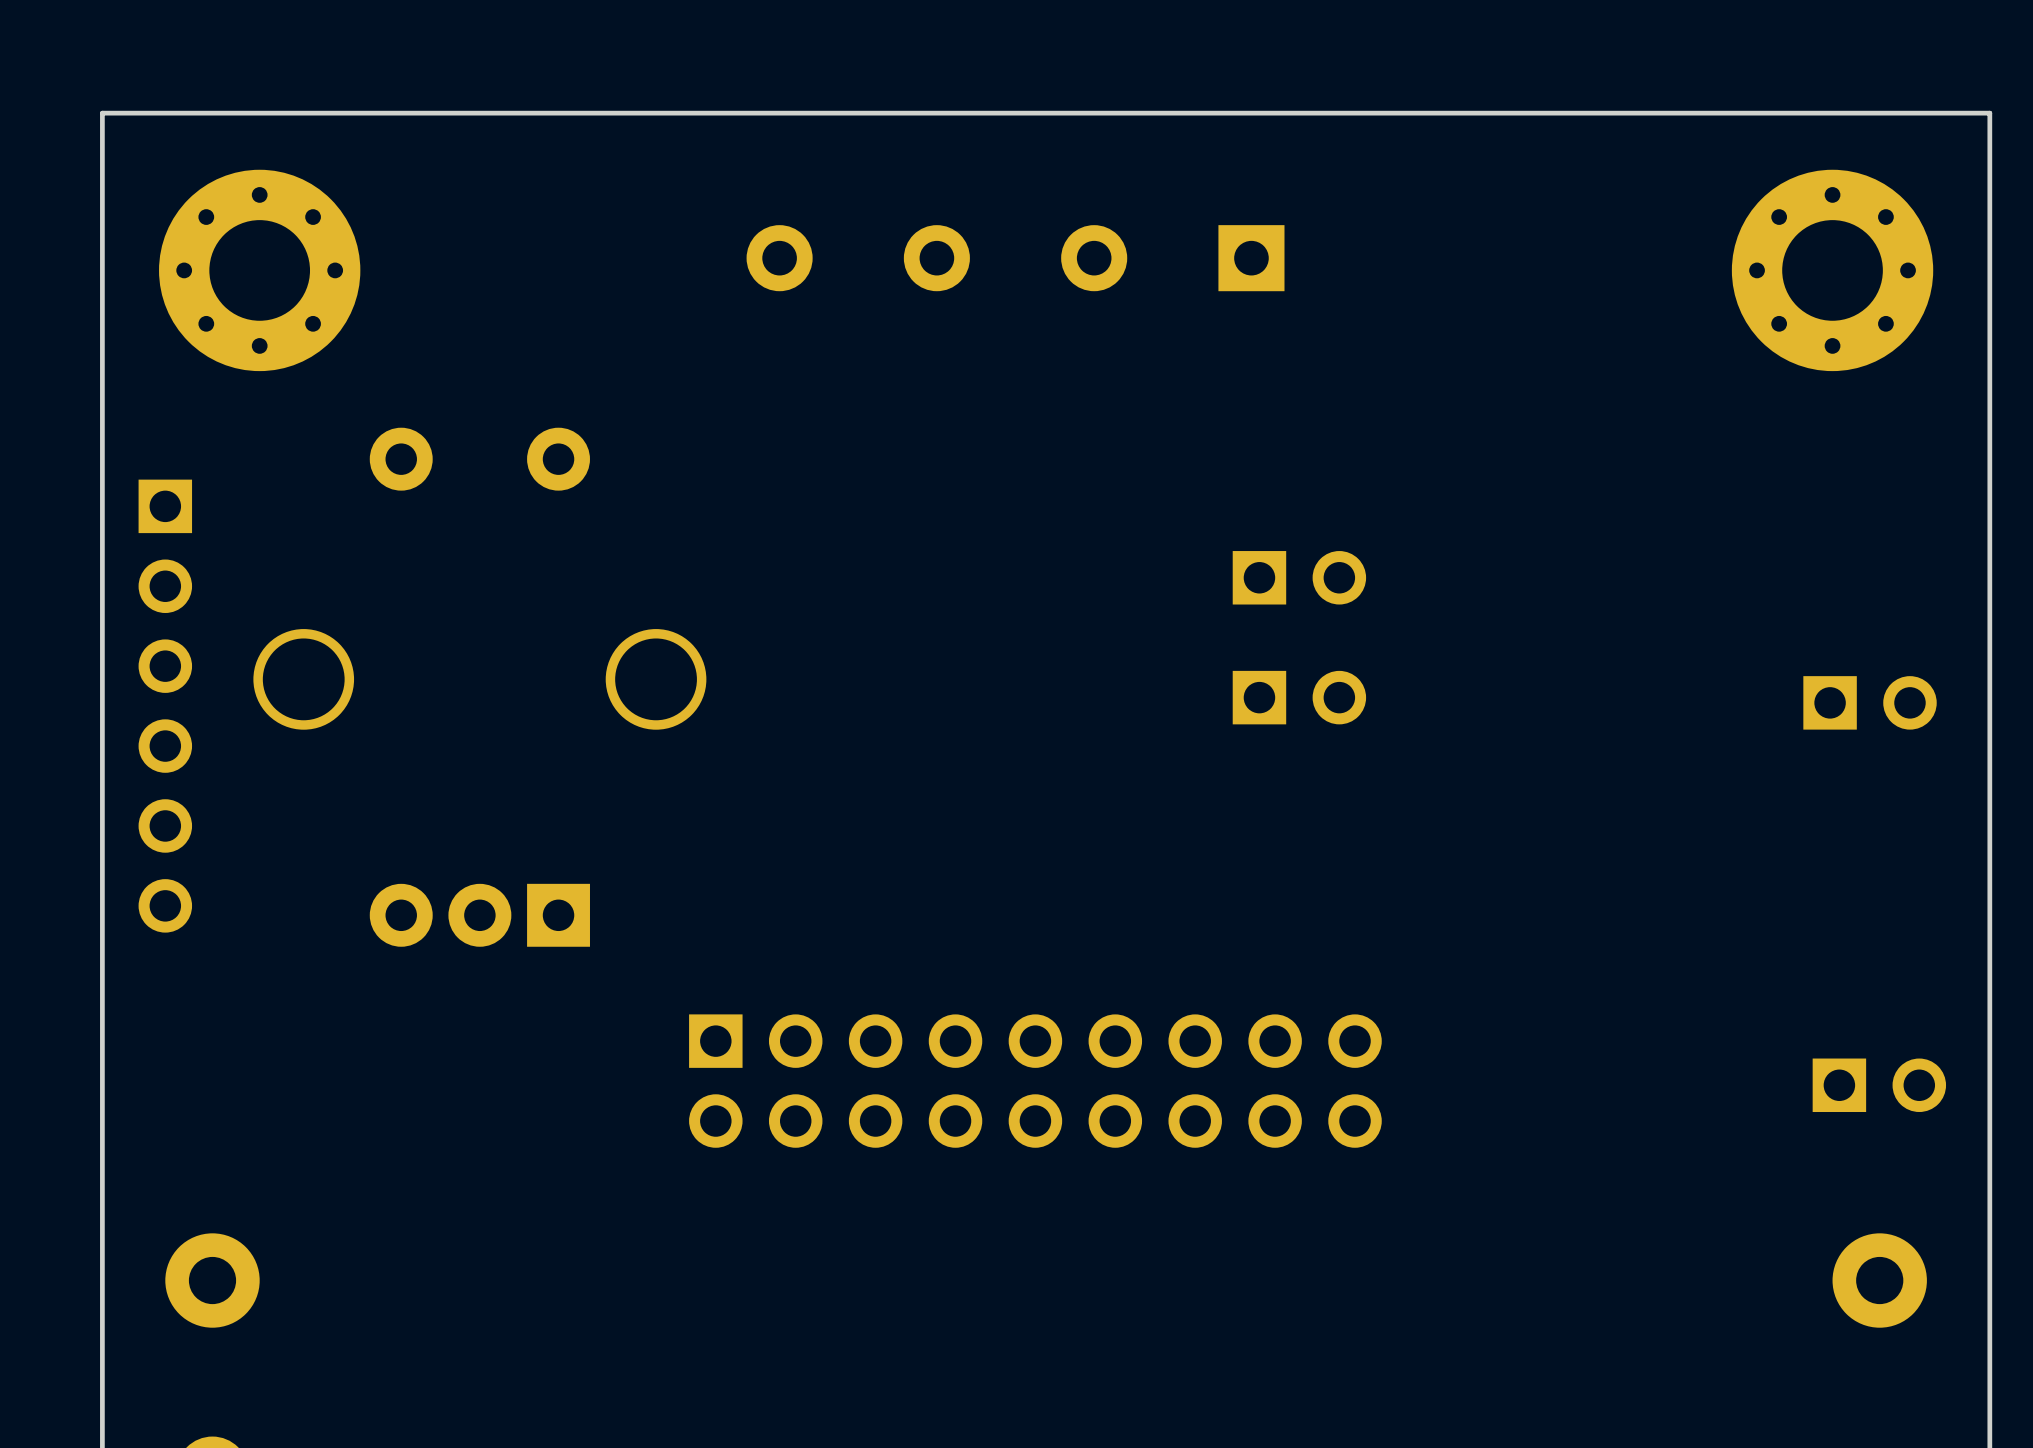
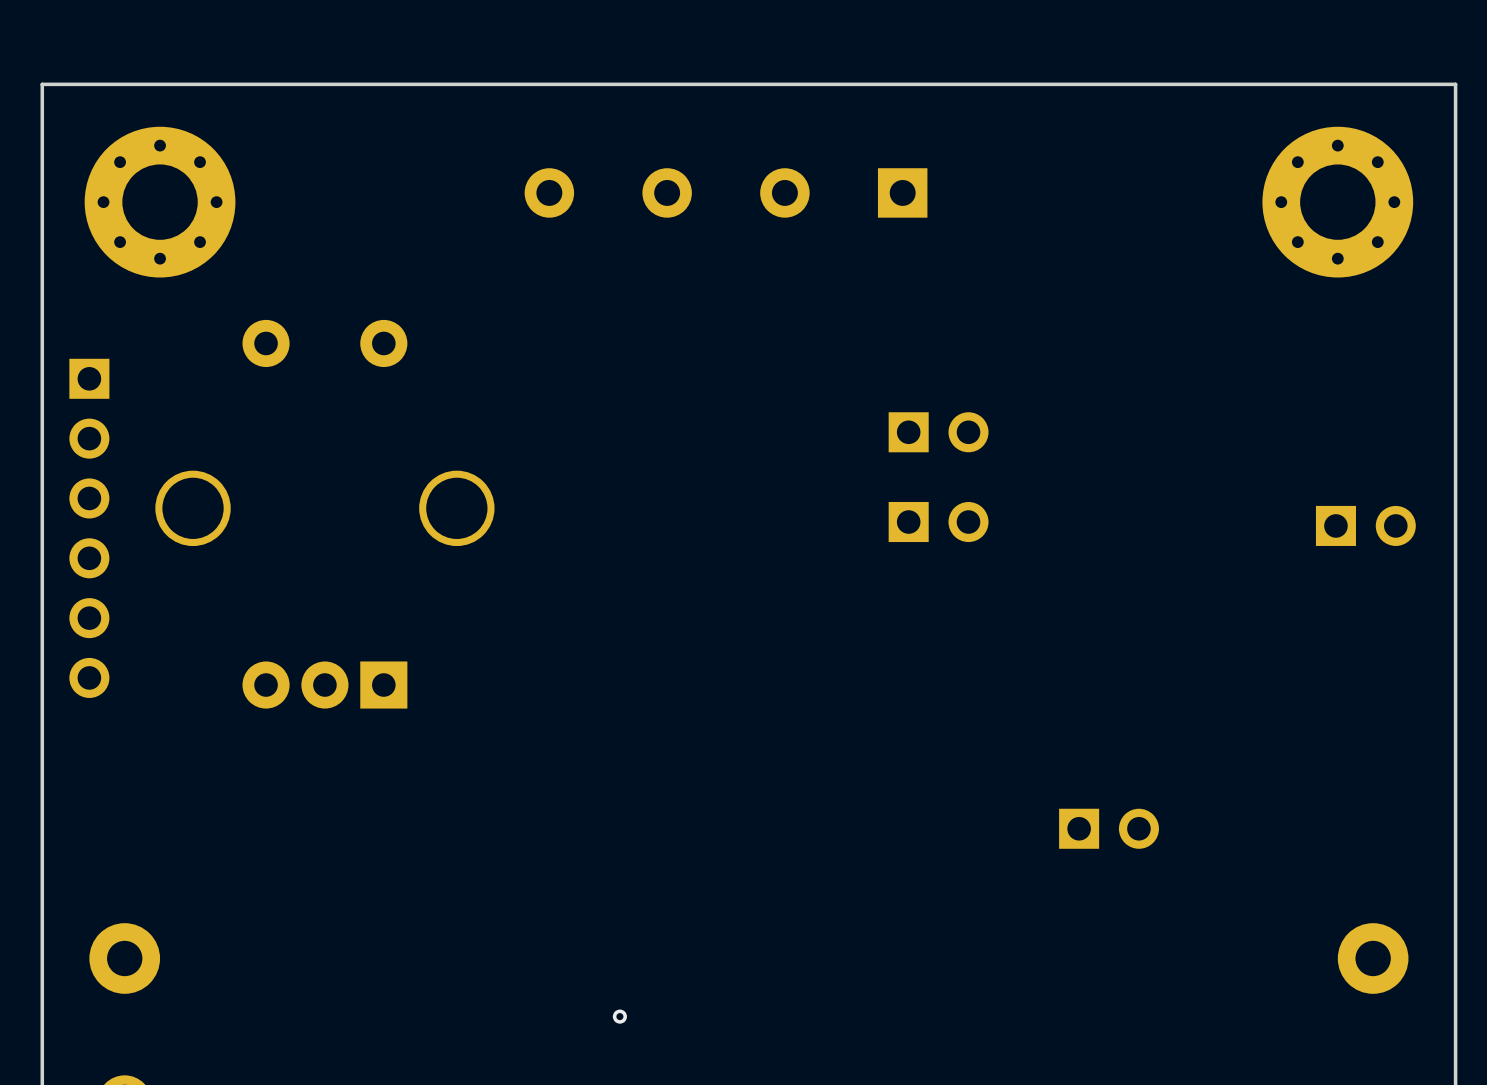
part: (1035, 1081) -> none
part position: (1879, 1085) -> (1109, 828)
via: none -> (619, 1016)

